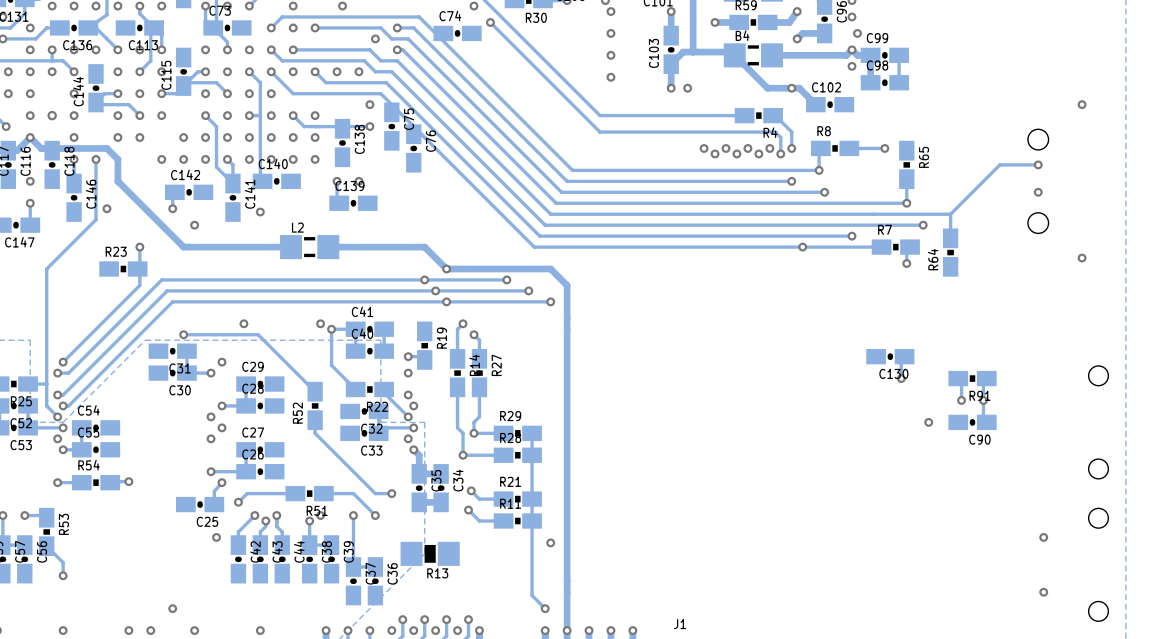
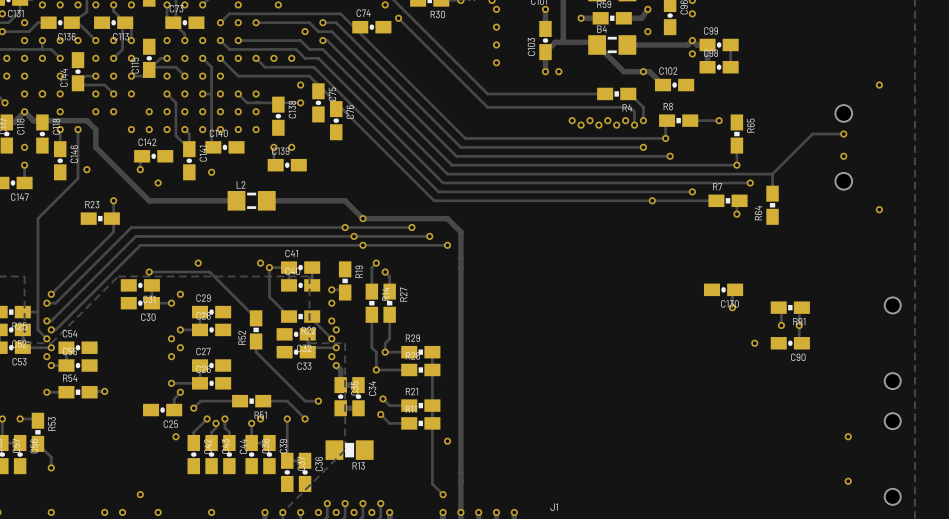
track: (824, 33) (802, 33) (797, 38) -> none
via: (857, 33) -> none

